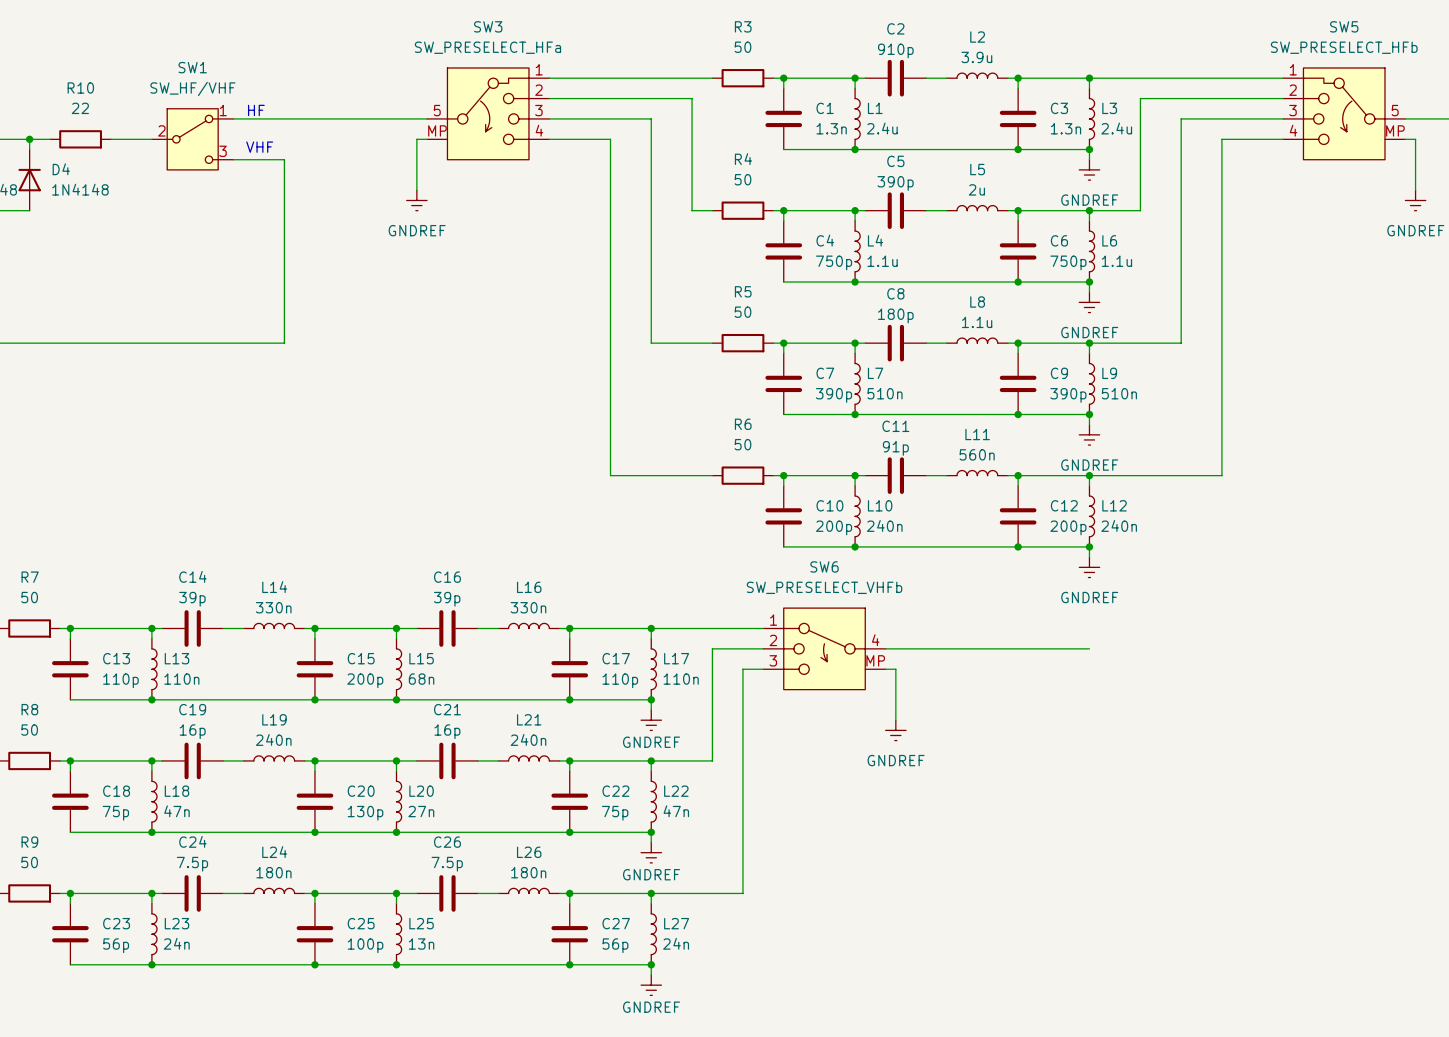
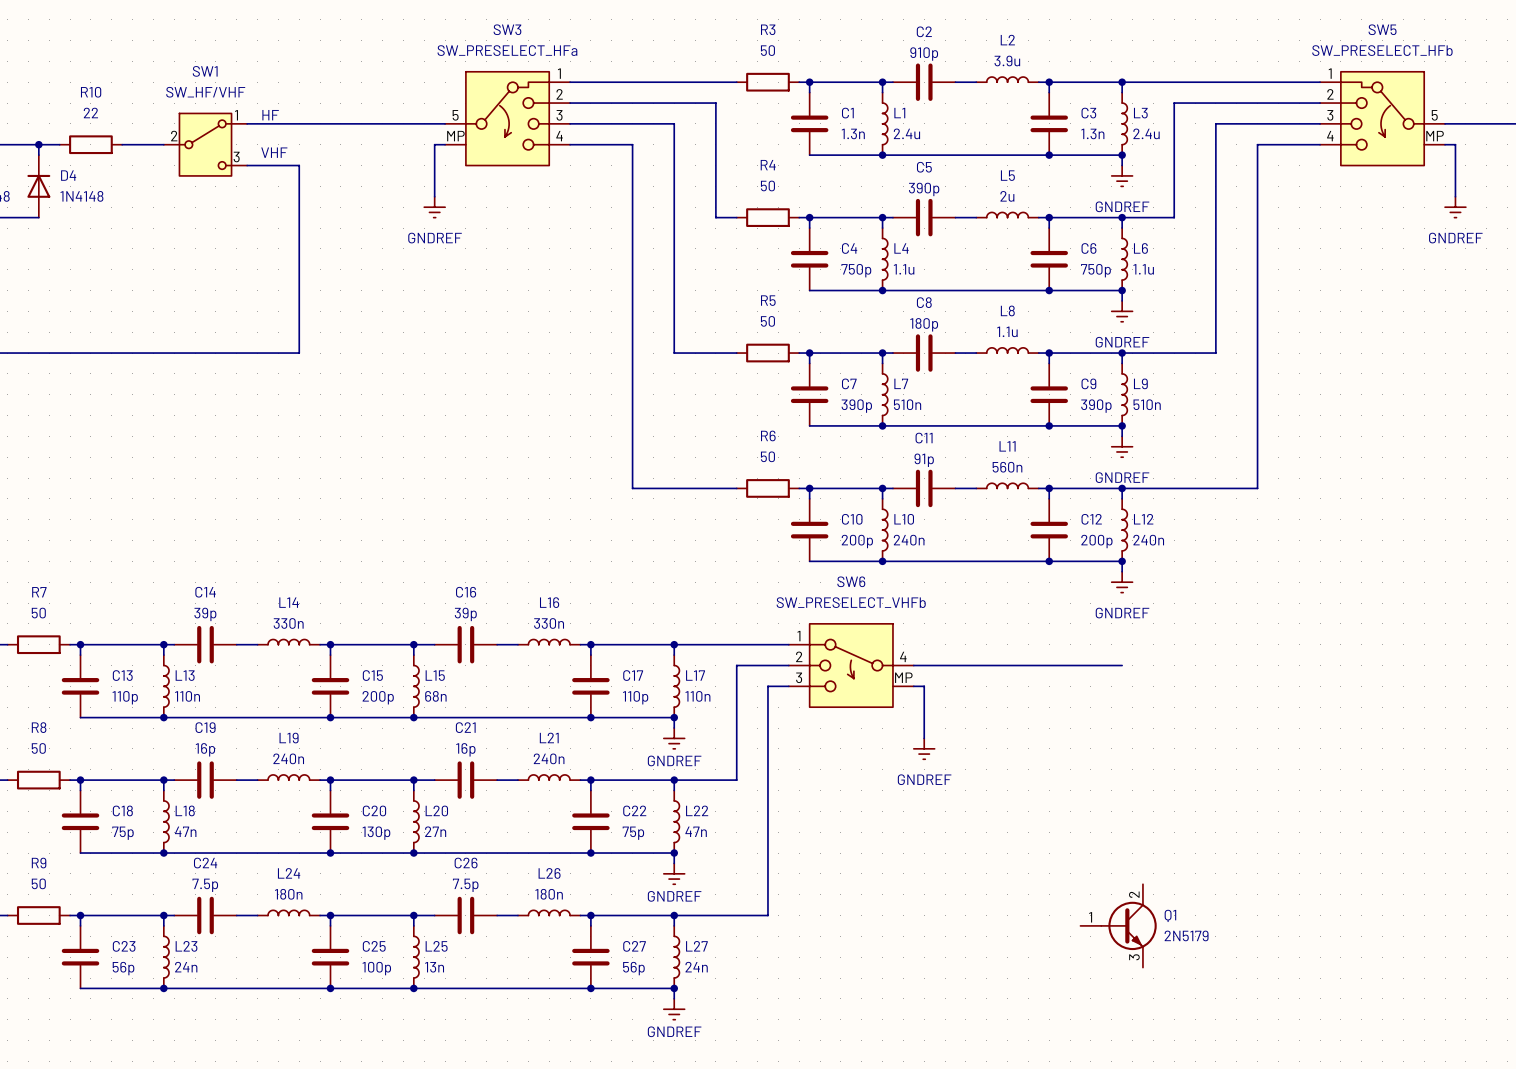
Q1: none -> 2N5179 (1118, 925)

